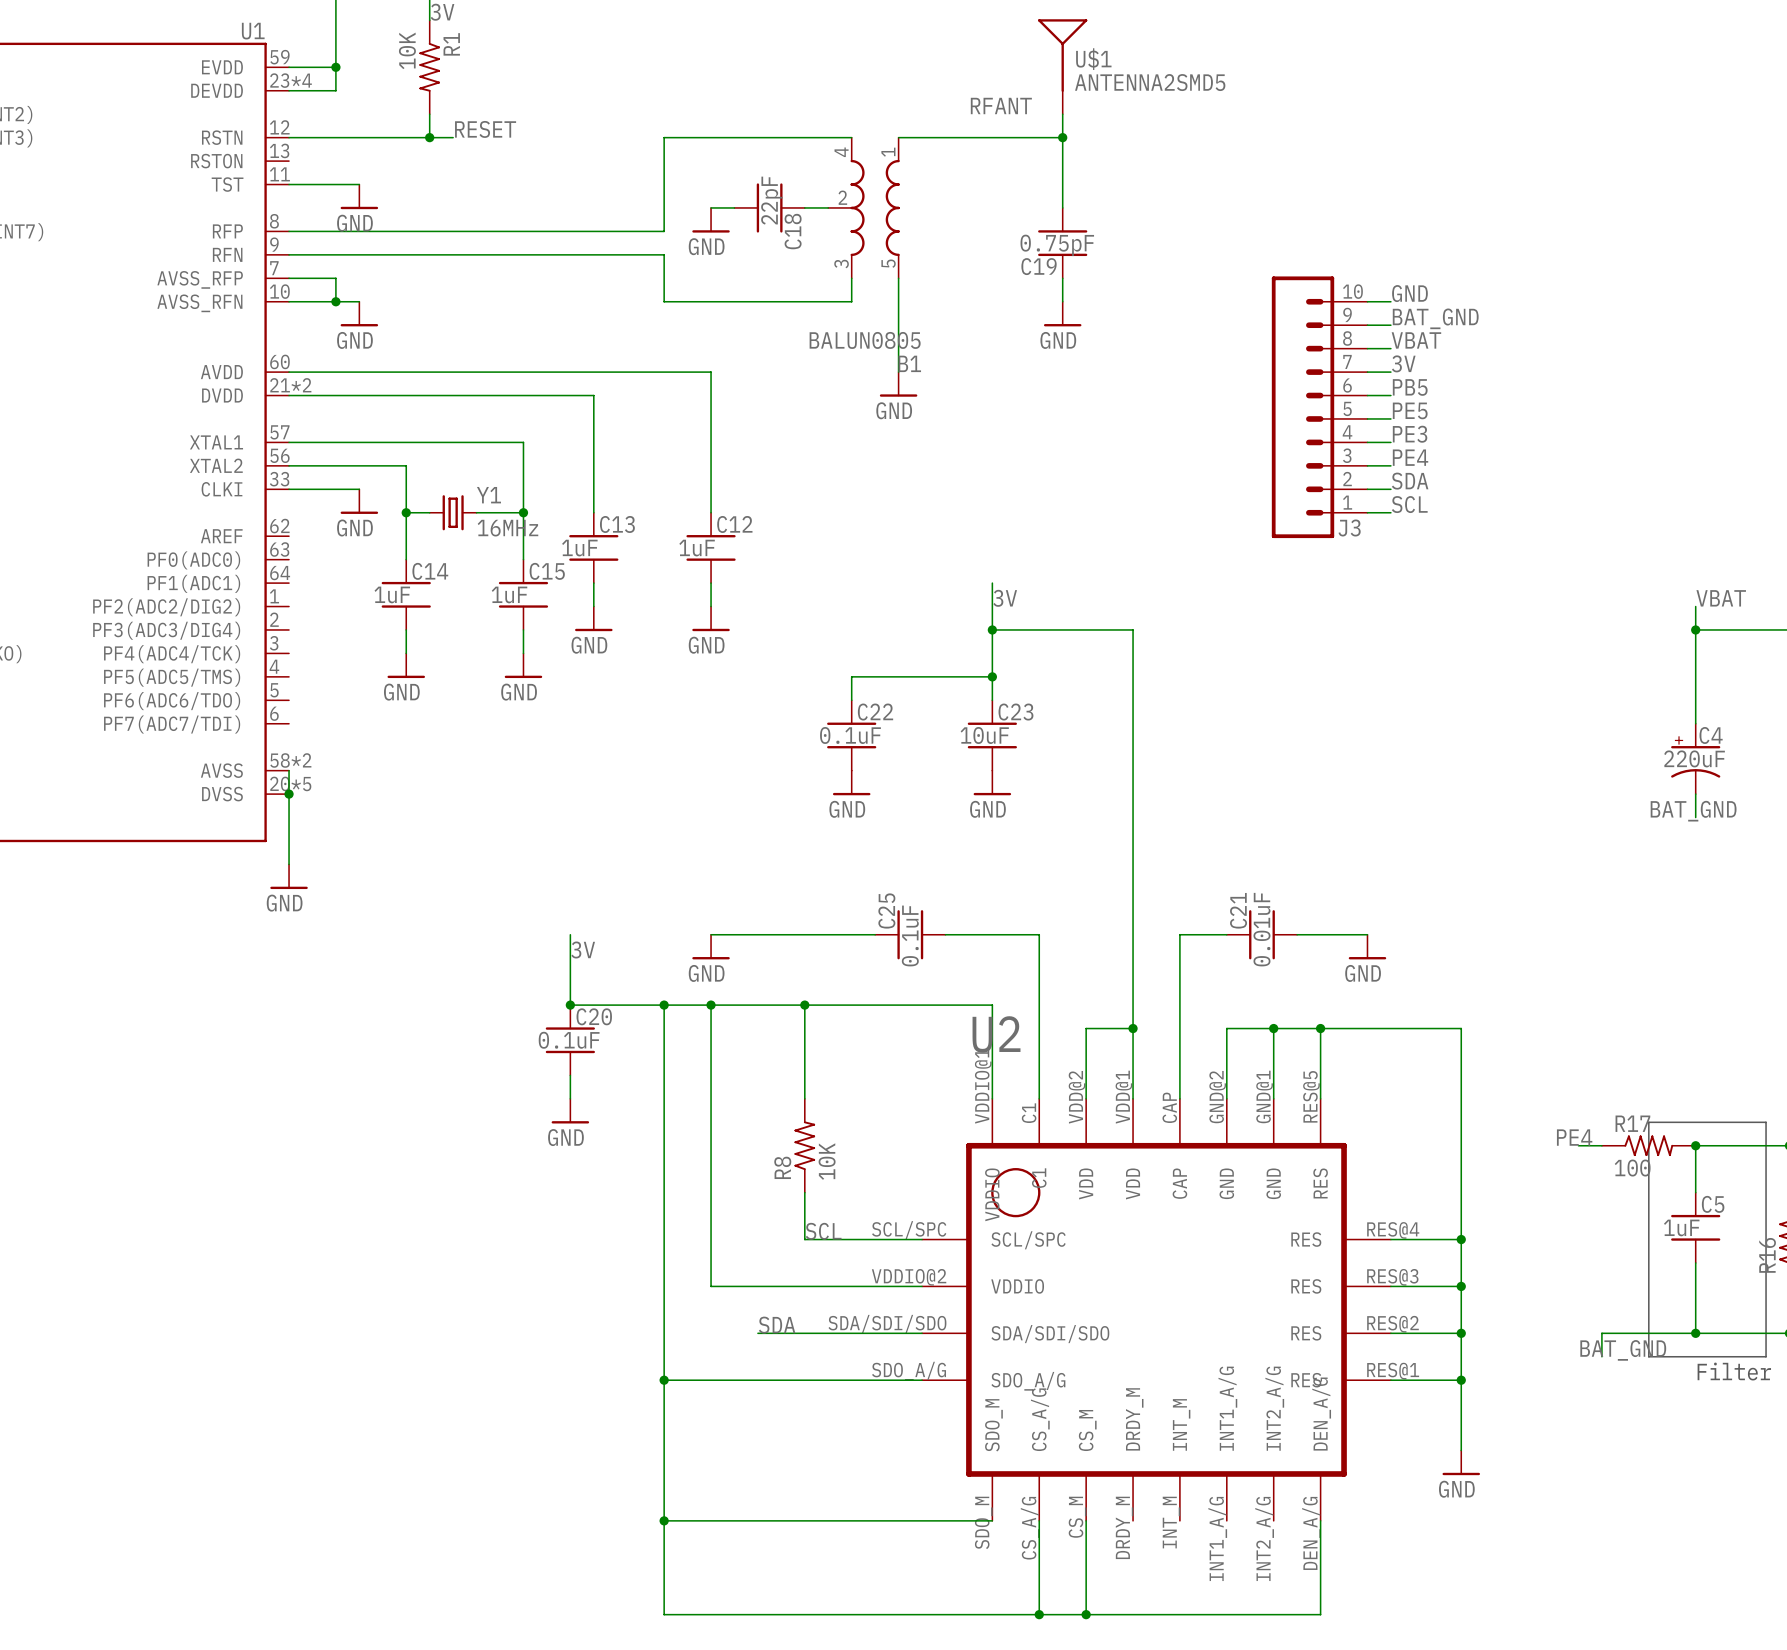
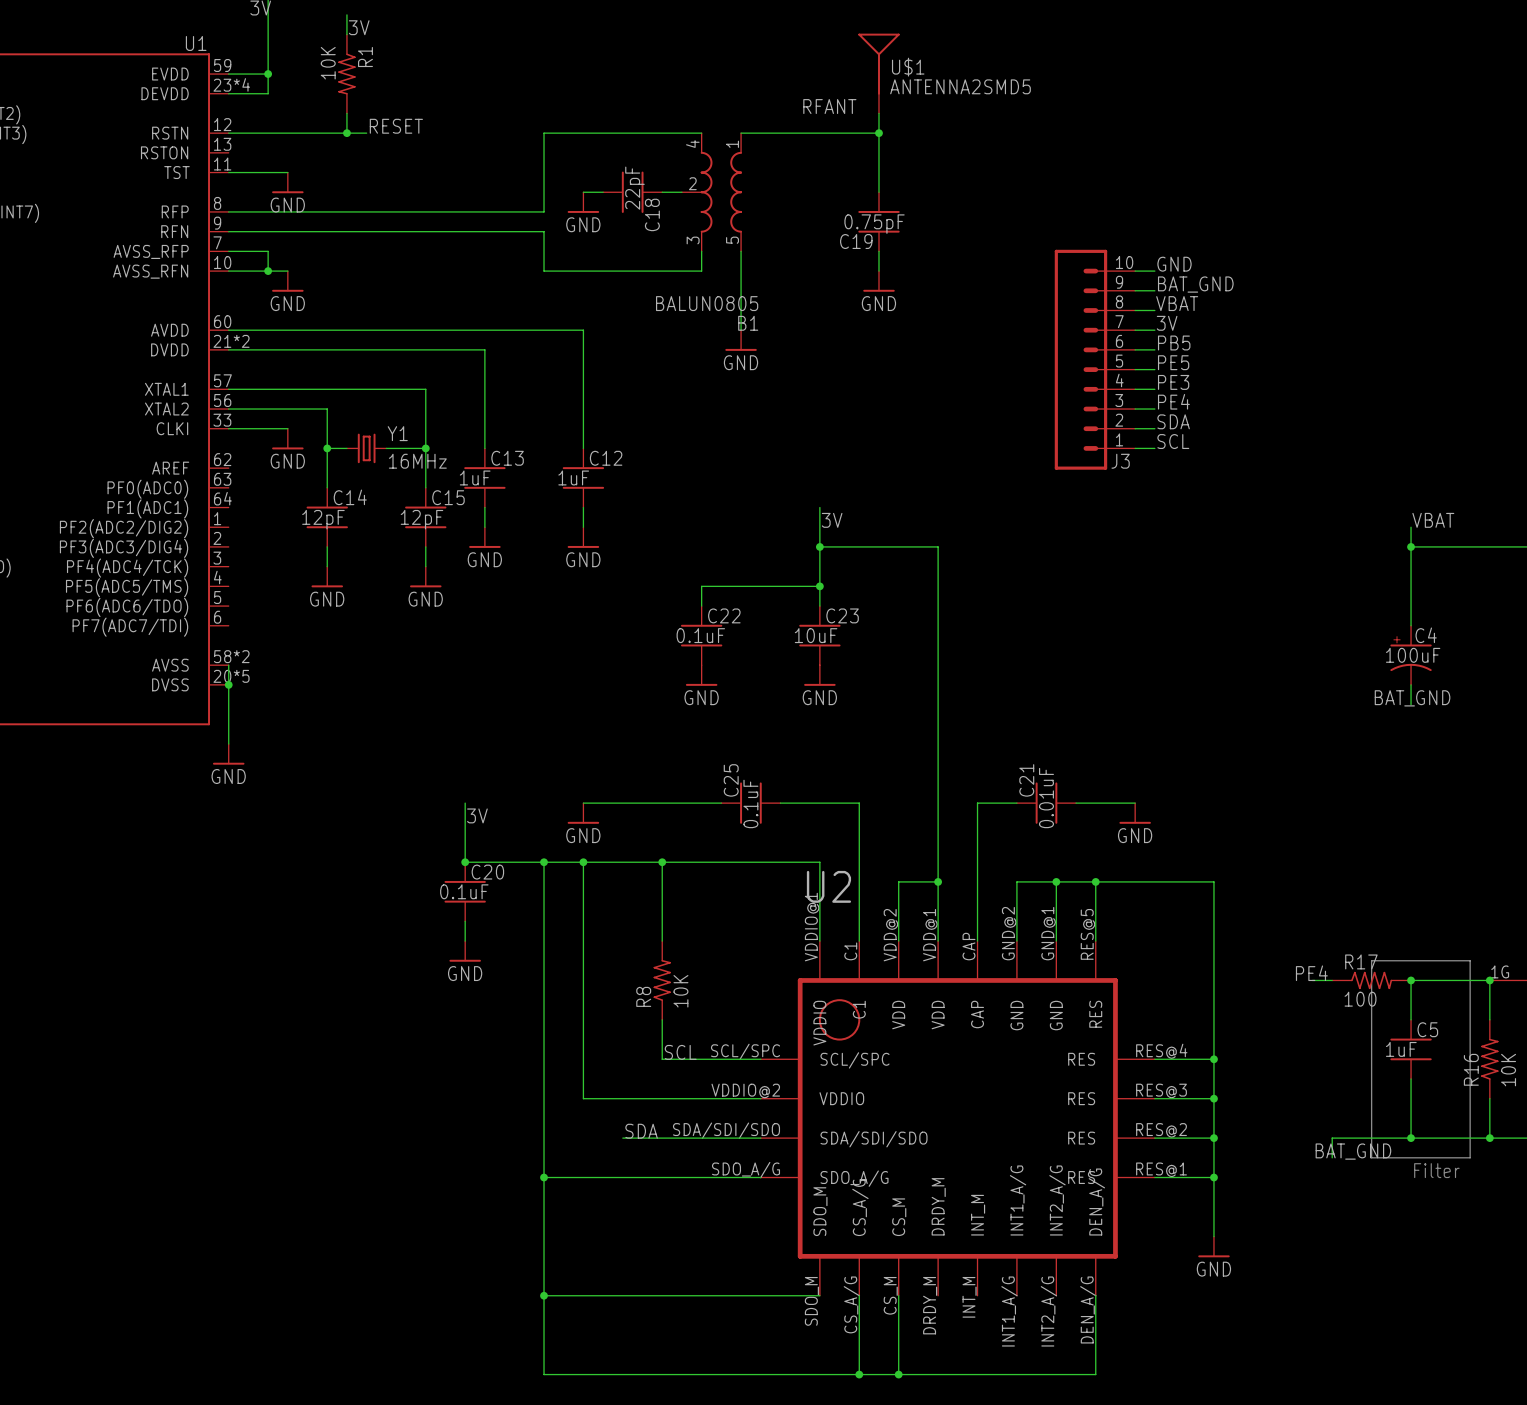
C14 value: 1uF (392, 594) -> 12pF (323, 519)
C15 value: 1uF (509, 594) -> 12pF (421, 519)
C4 value: 220uF (1694, 758) -> 100uF (1413, 655)

